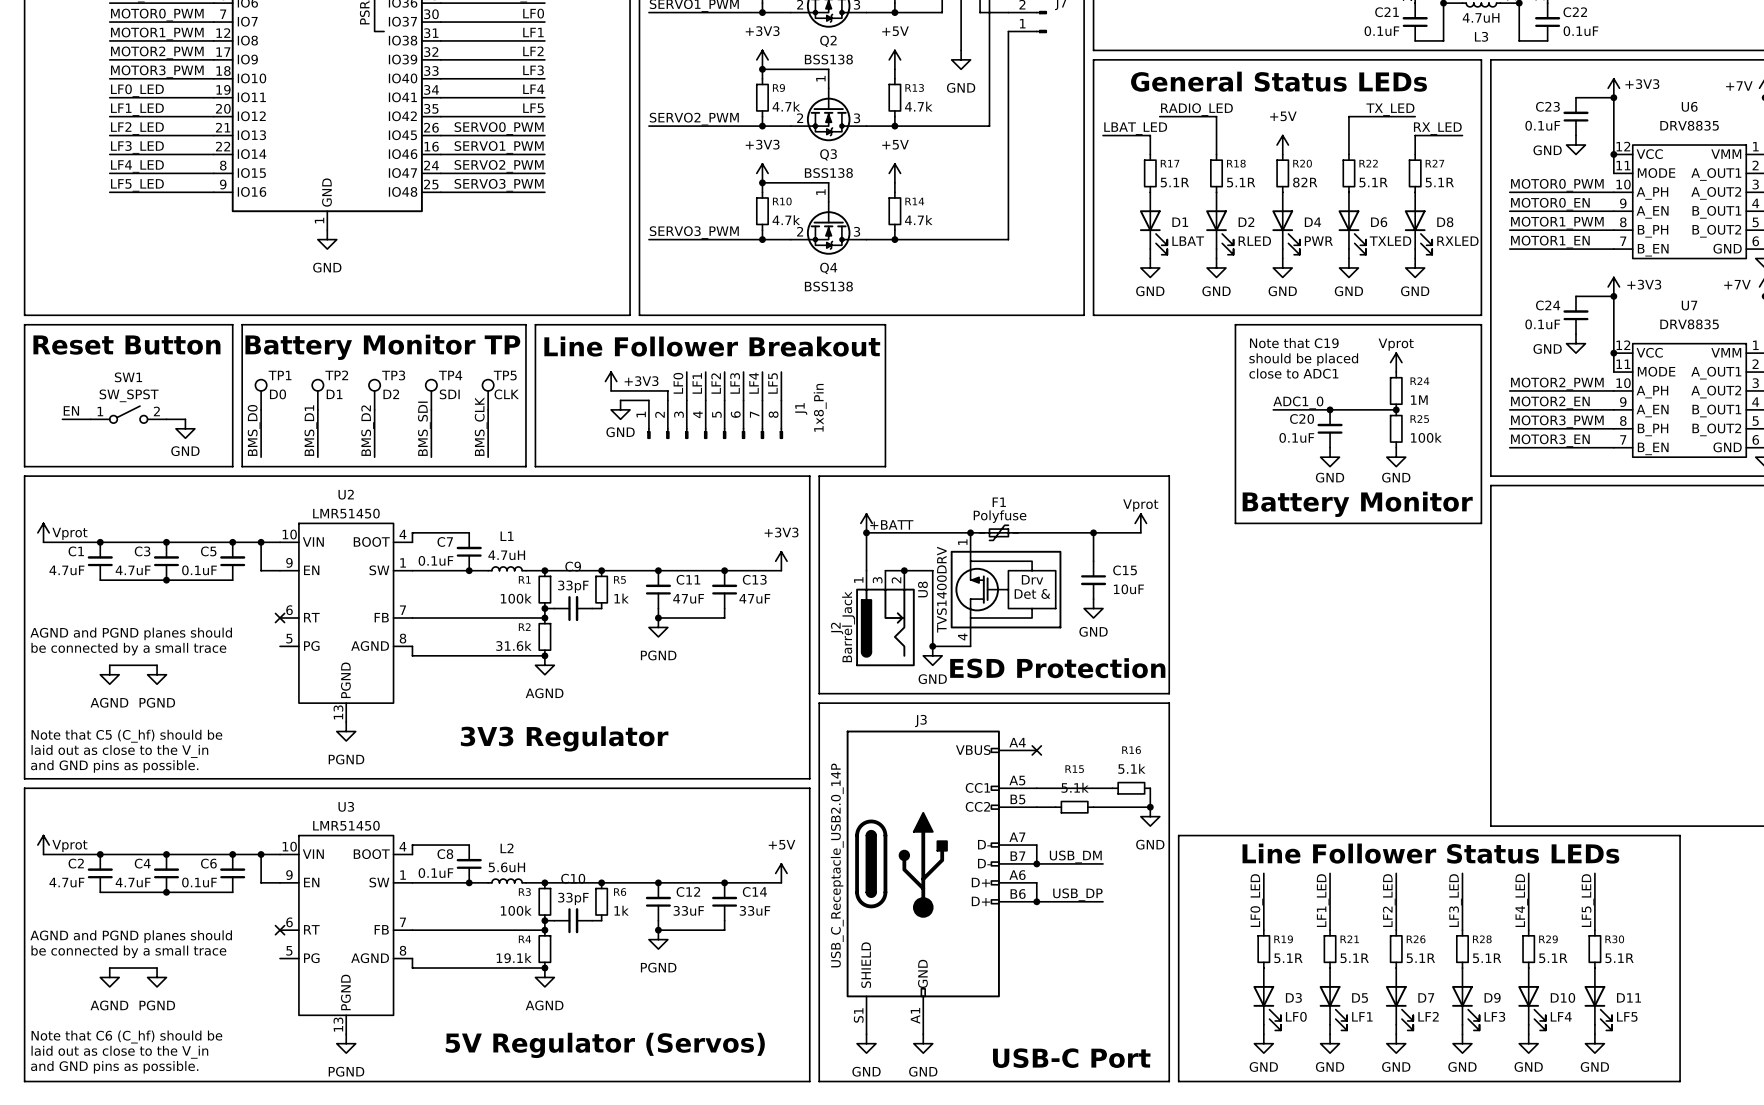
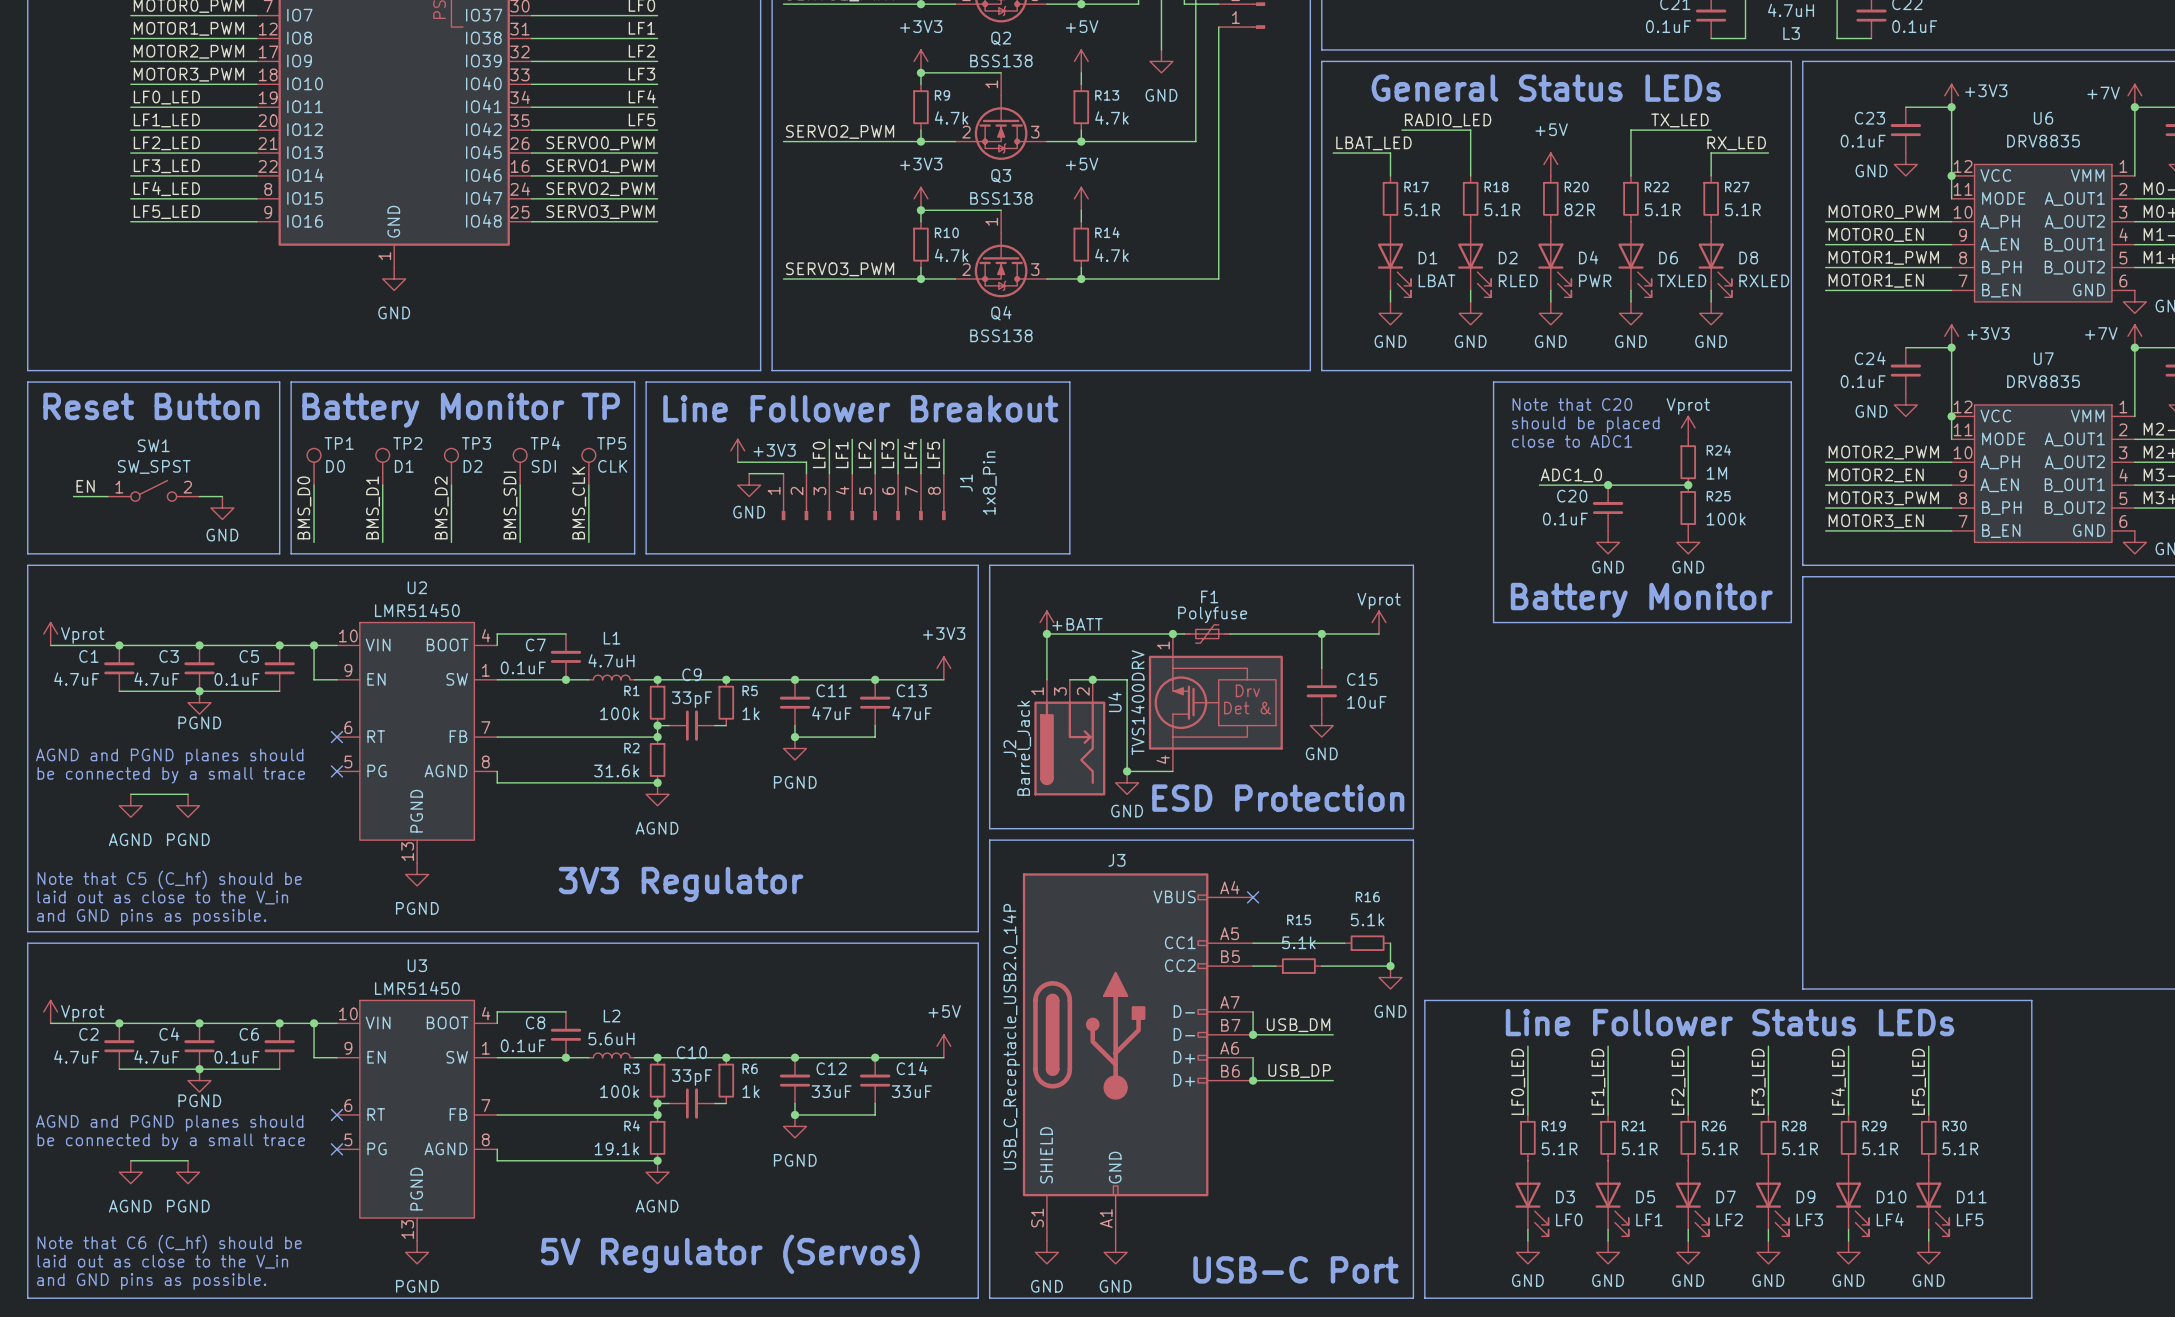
text: Note that C19 (1294, 343) -> Note that C20 (1572, 404)
power symbol: none -> PGND (199, 702)
U8 name: U8 (922, 589) -> U4 (1114, 702)
no-connect mark: none -> (336, 771)
power symbol: none -> PGND (199, 1080)
no-connect mark: none -> (336, 1149)

